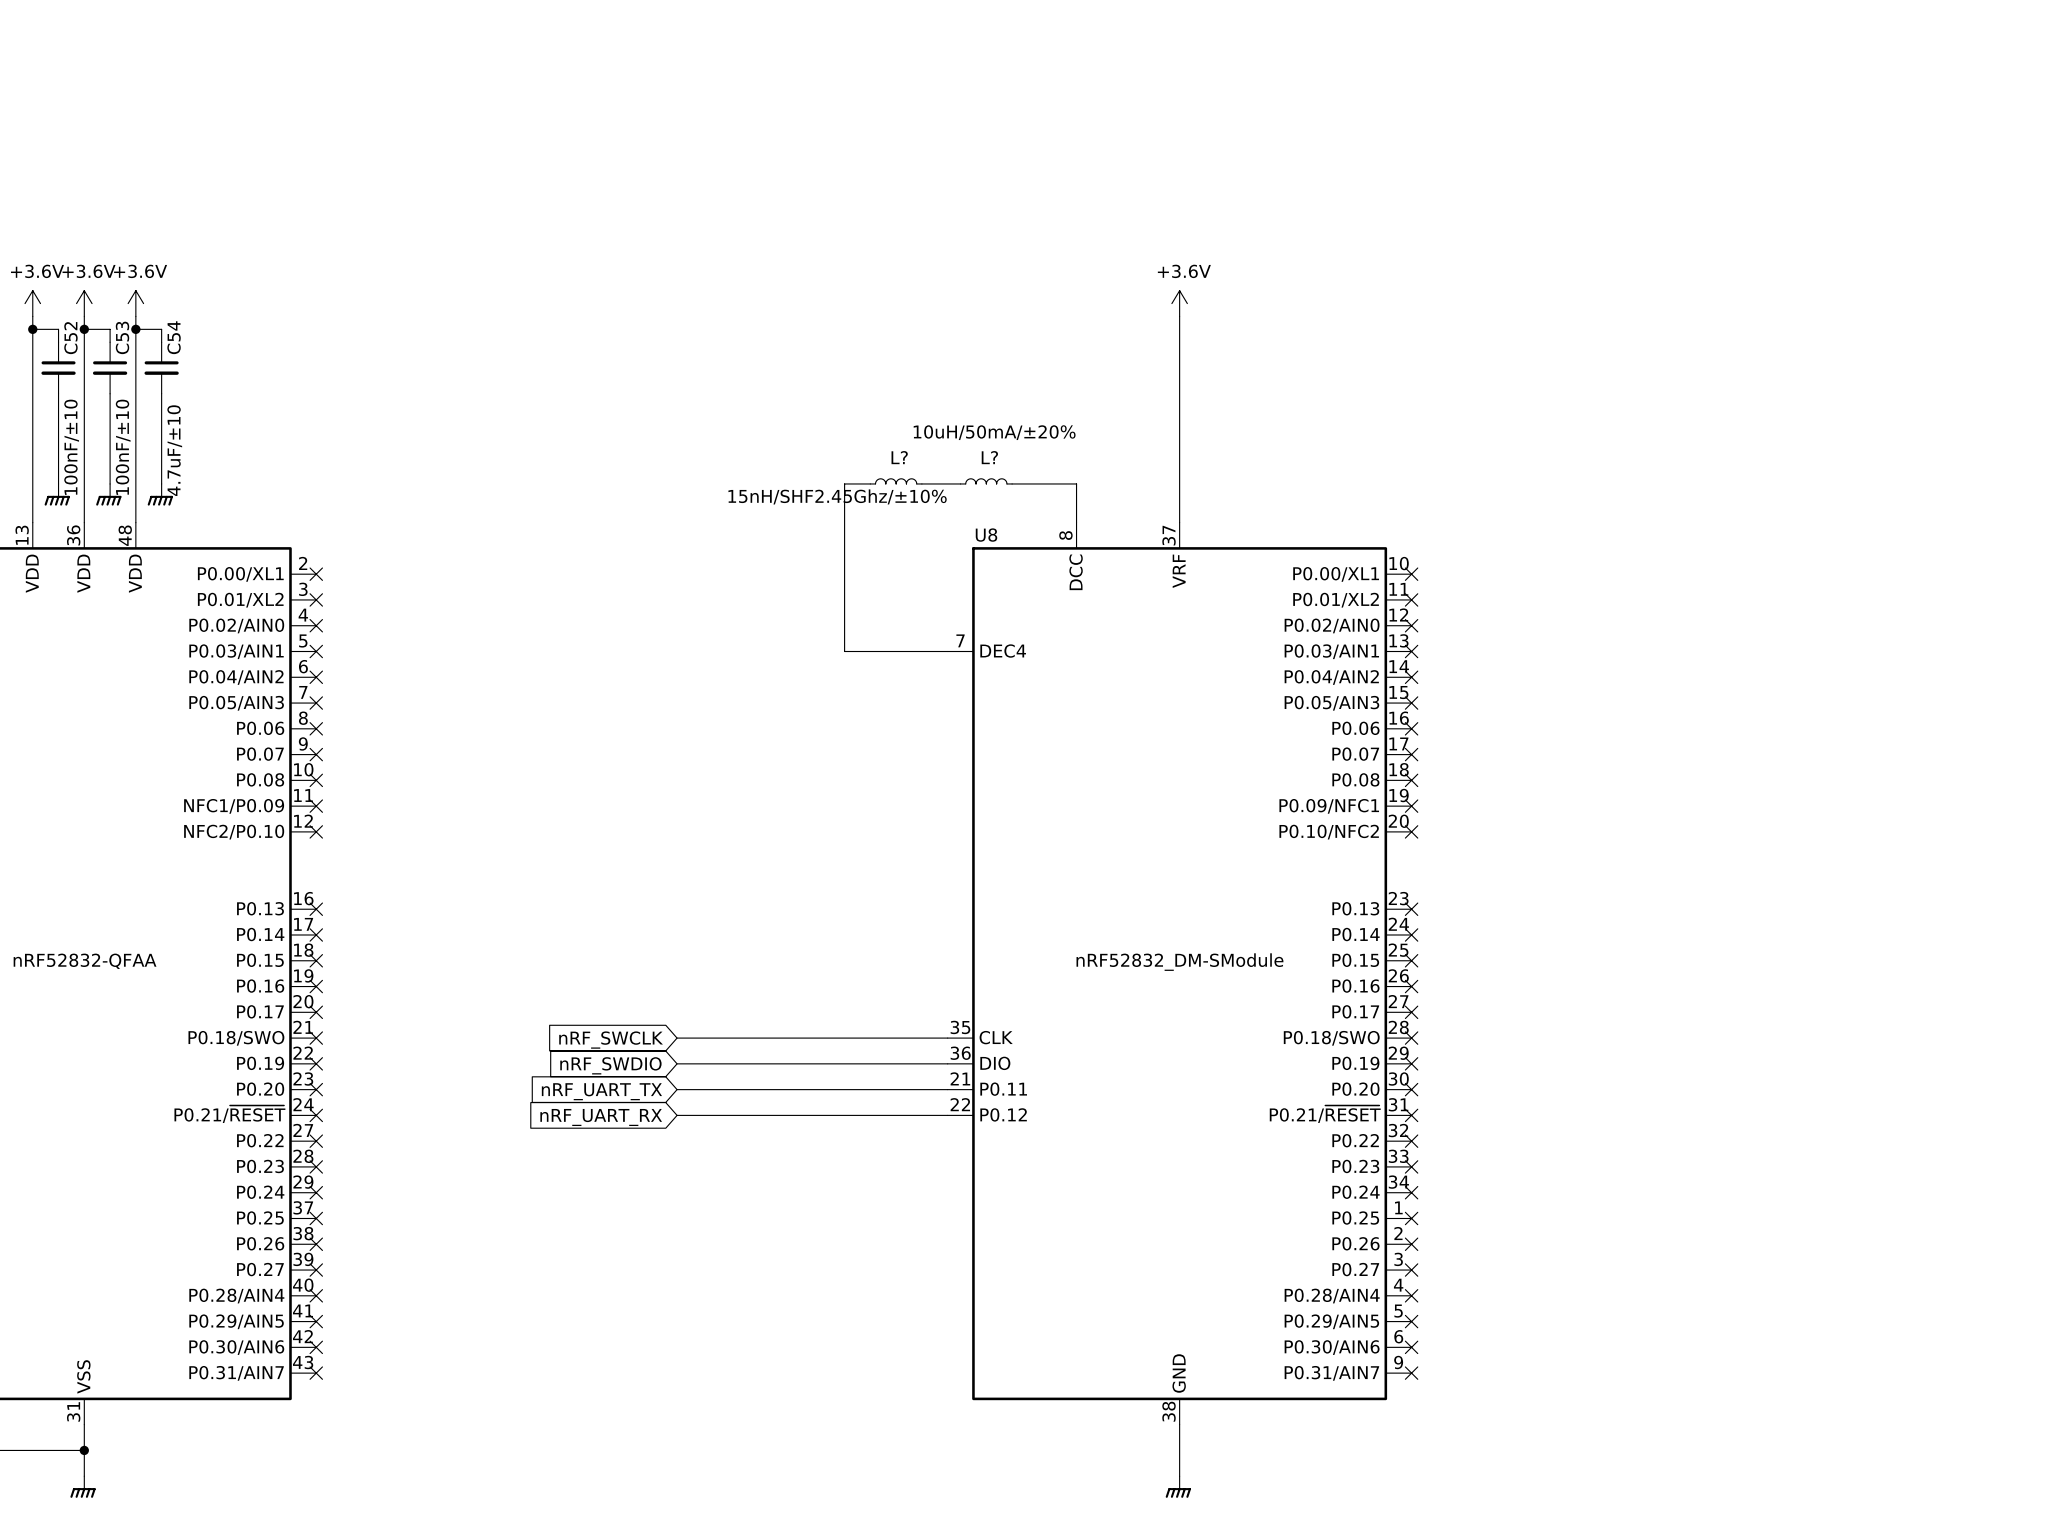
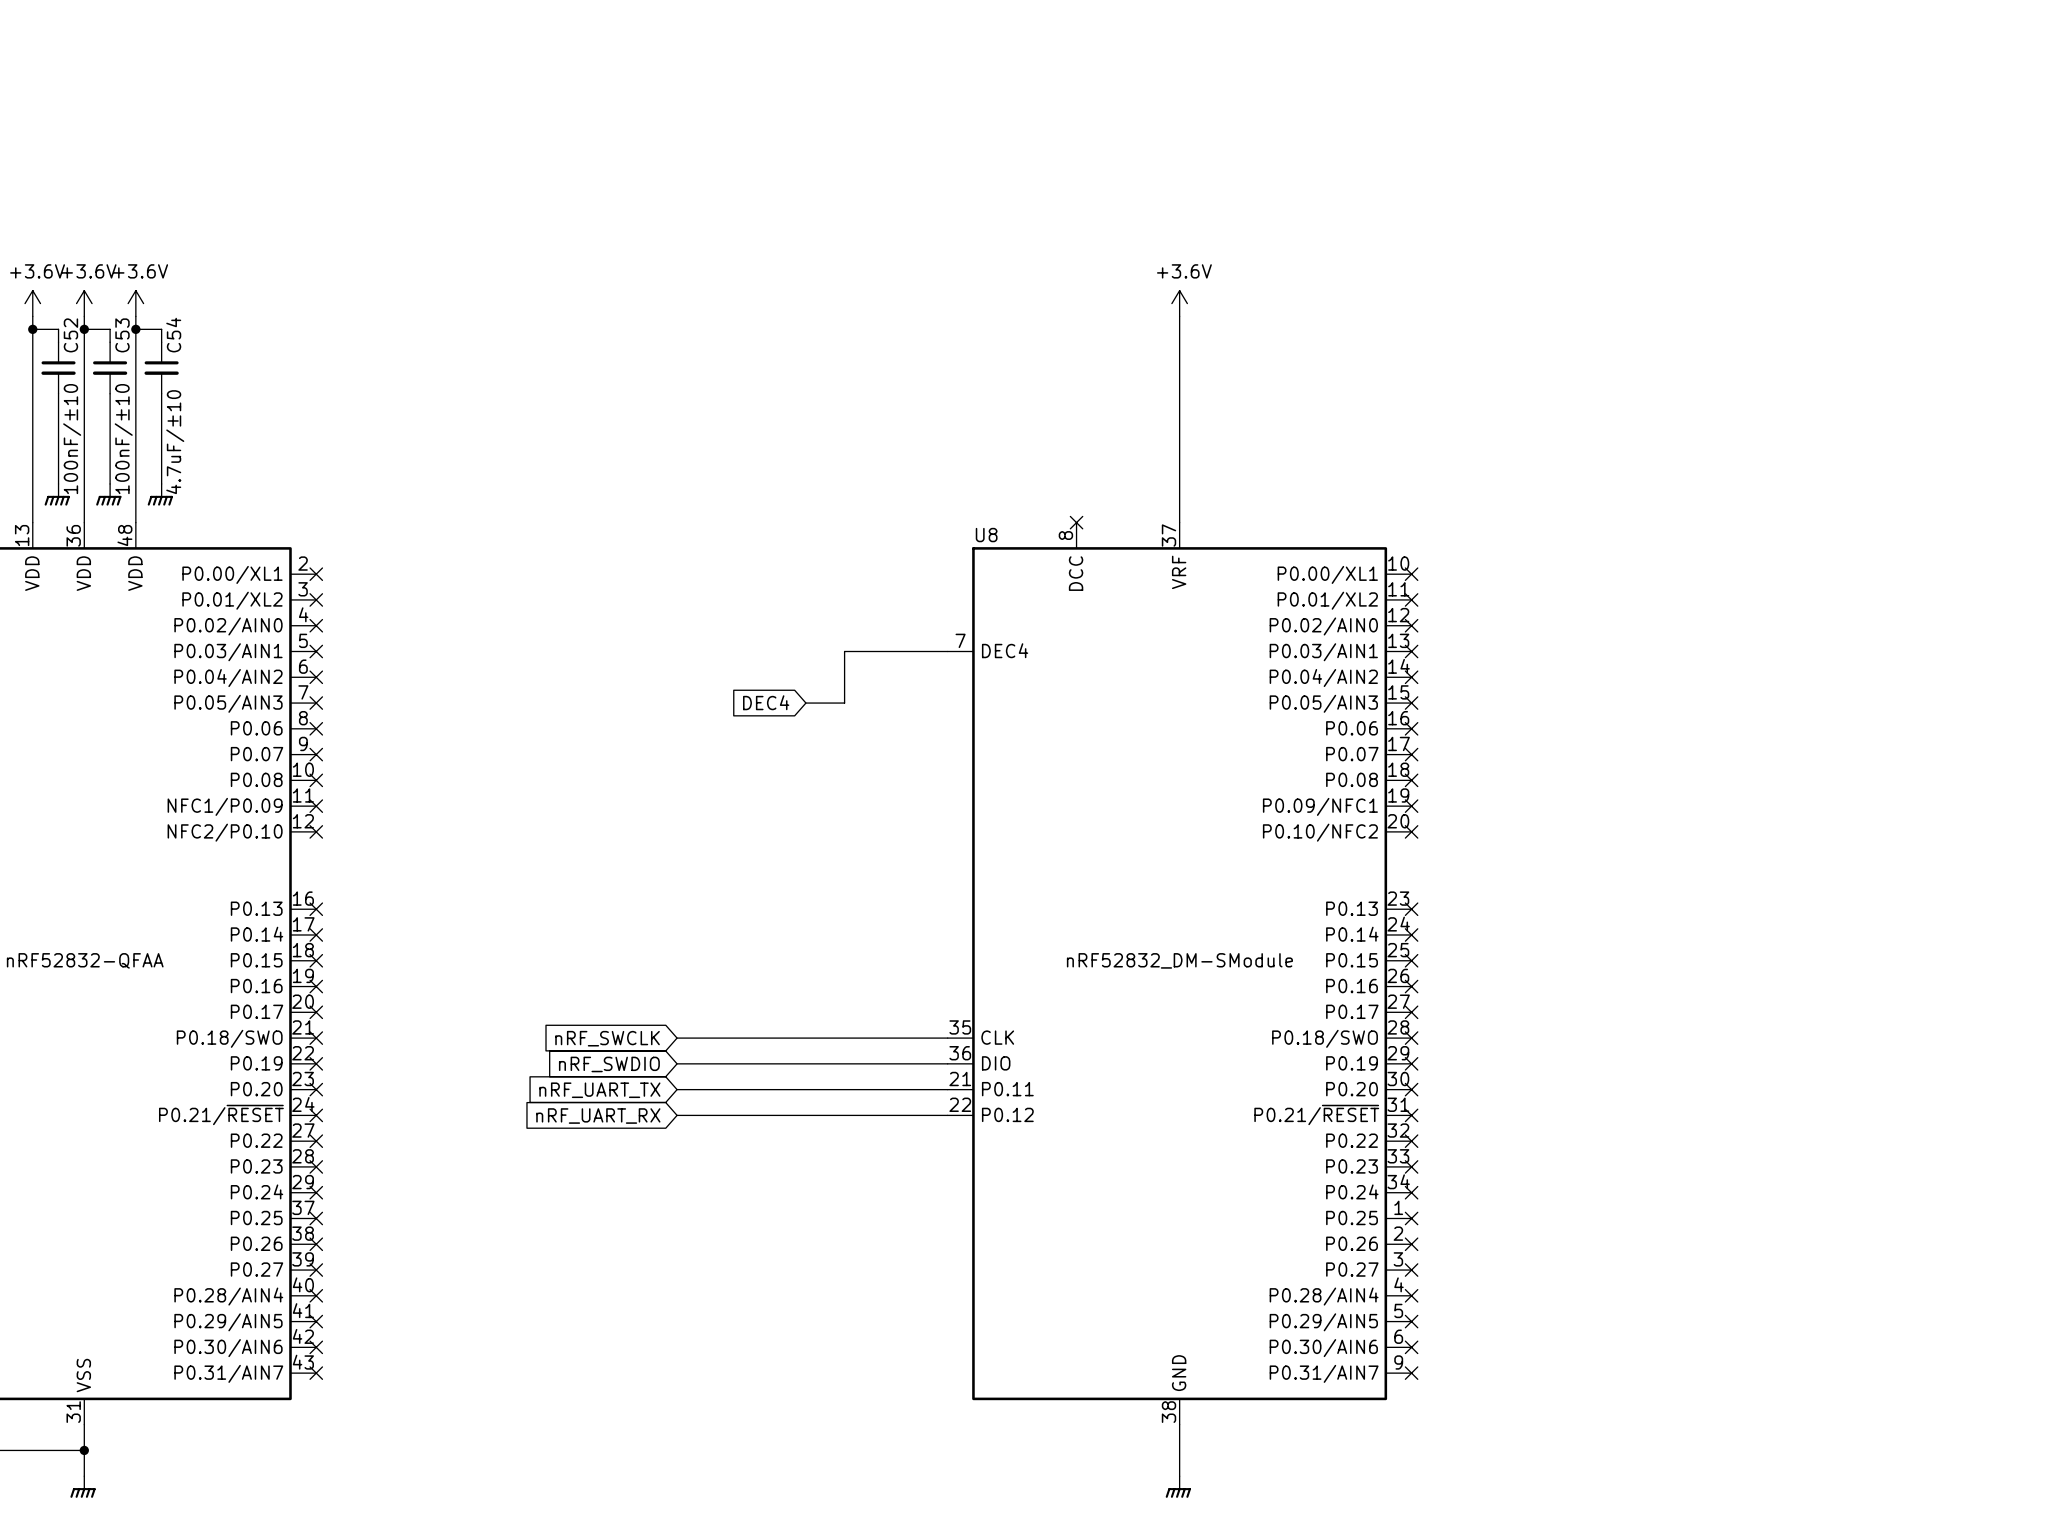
L?: (896, 481) -> none
L?: (986, 481) -> none
wire: (870, 483) (844, 483) (844, 651) -> (805, 703) (844, 703) (844, 651)
wire: (921, 483) (960, 483) -> none
wire: (1012, 483) (1076, 483) (1076, 522) -> none
no-connect mark: none -> (1076, 522)
global label: none -> DEC4 (766, 702)

